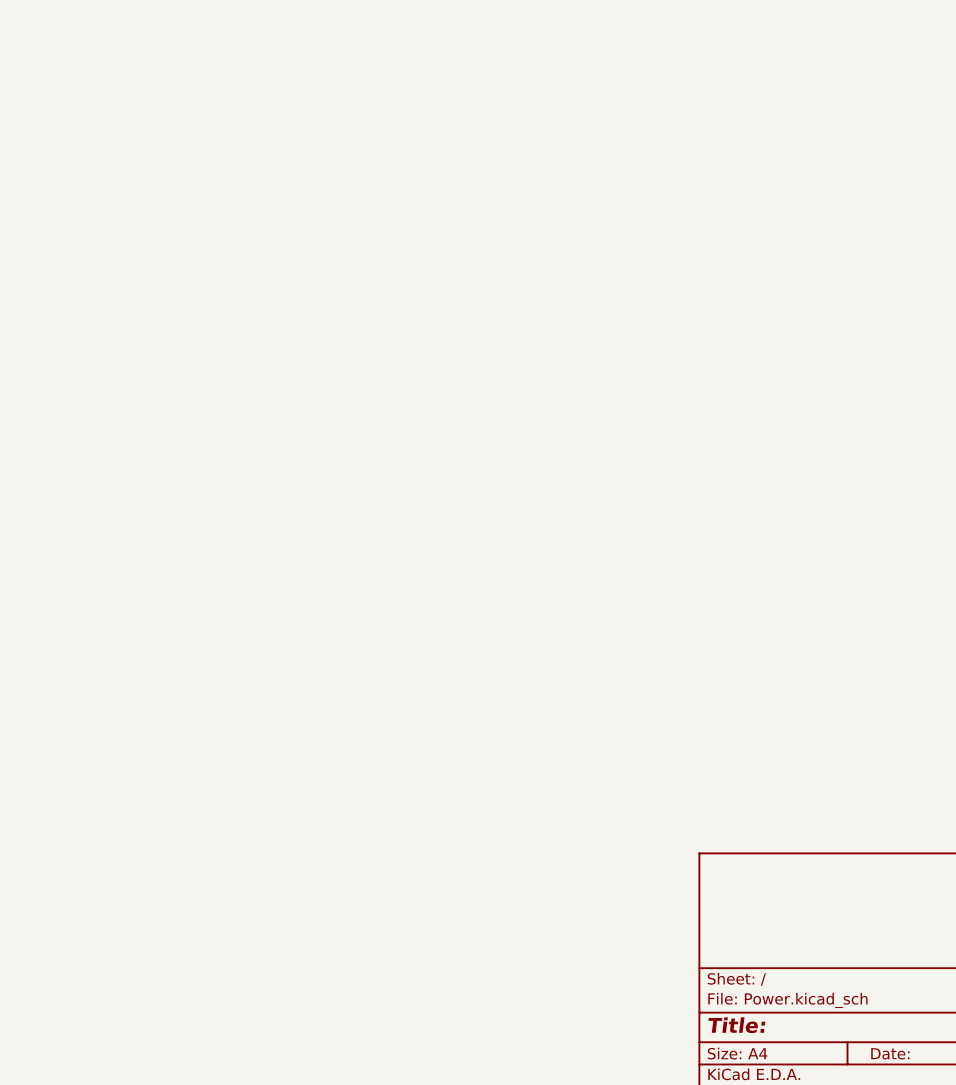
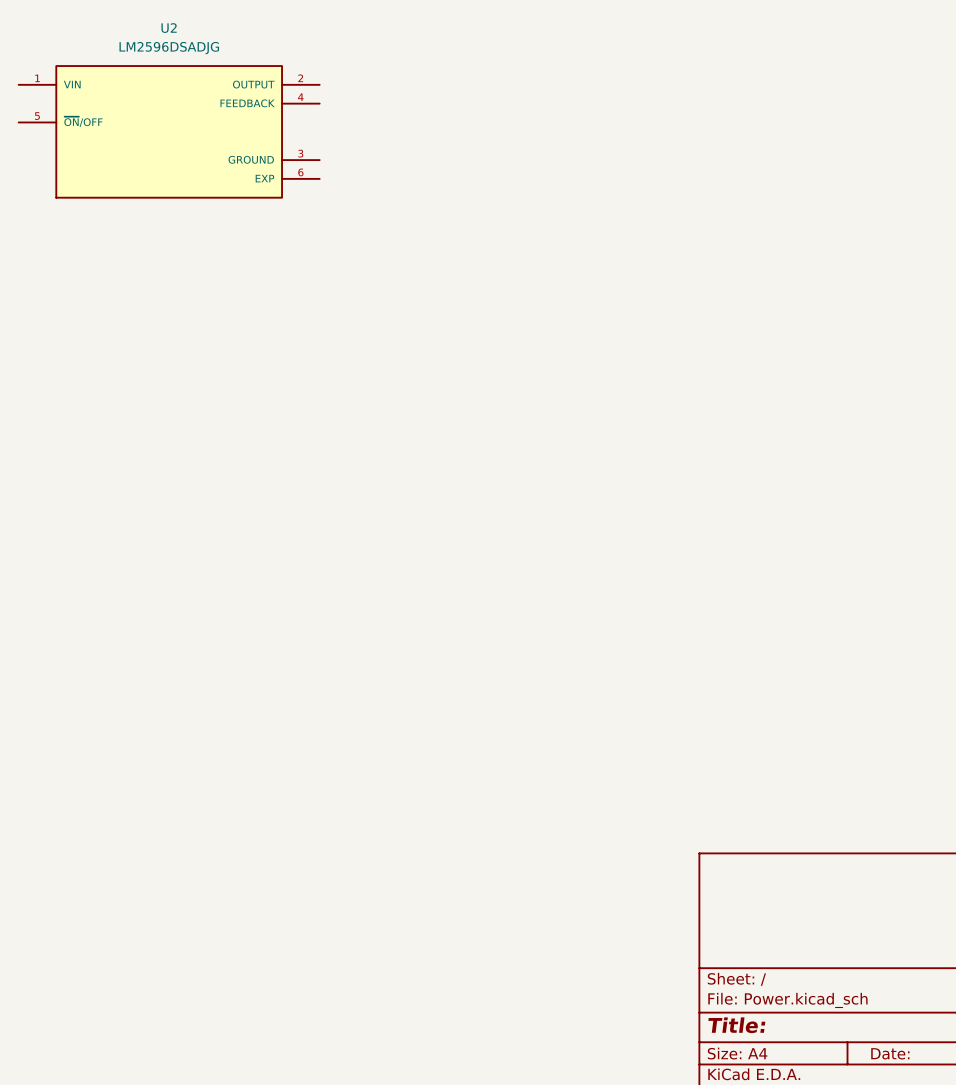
U2: none -> LM2596DSADJG (169, 131)

